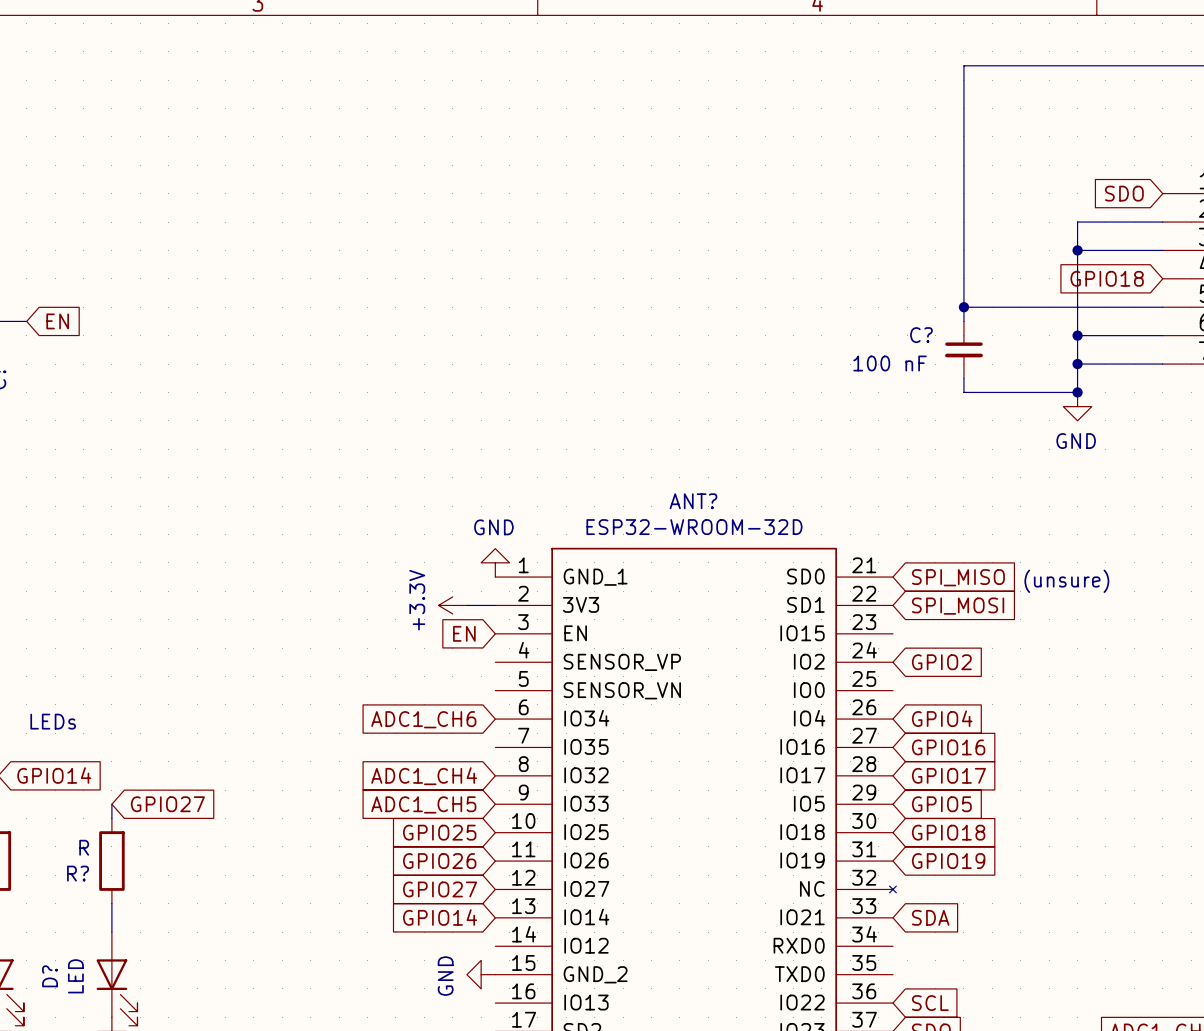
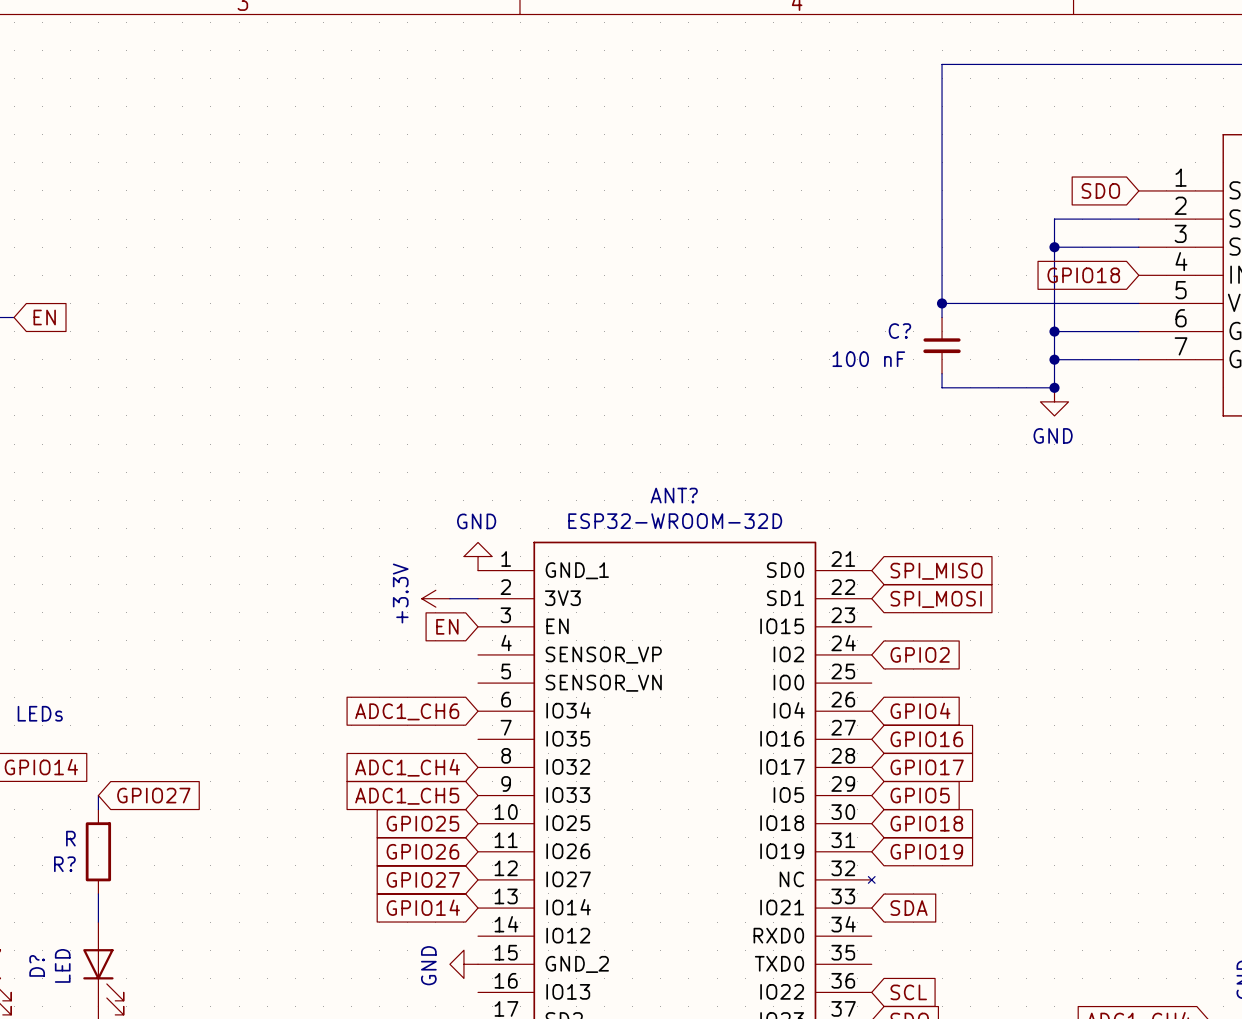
text: (unsure) (1066, 581) -> none

